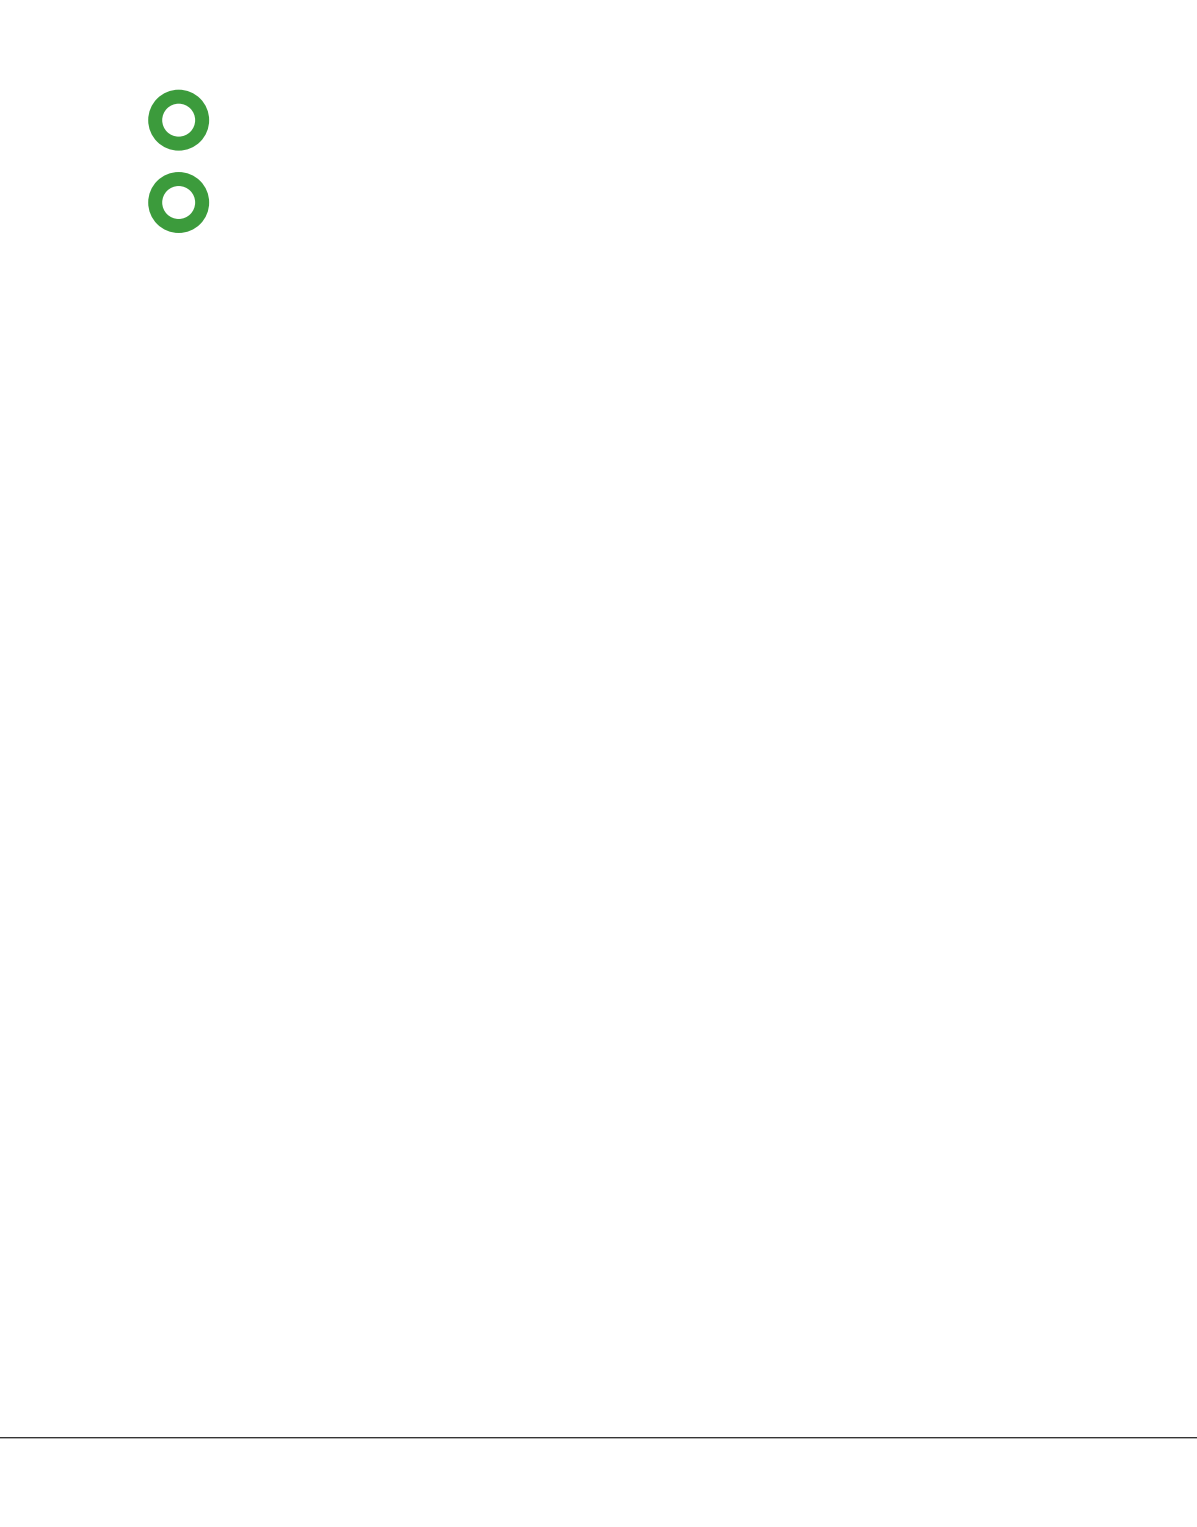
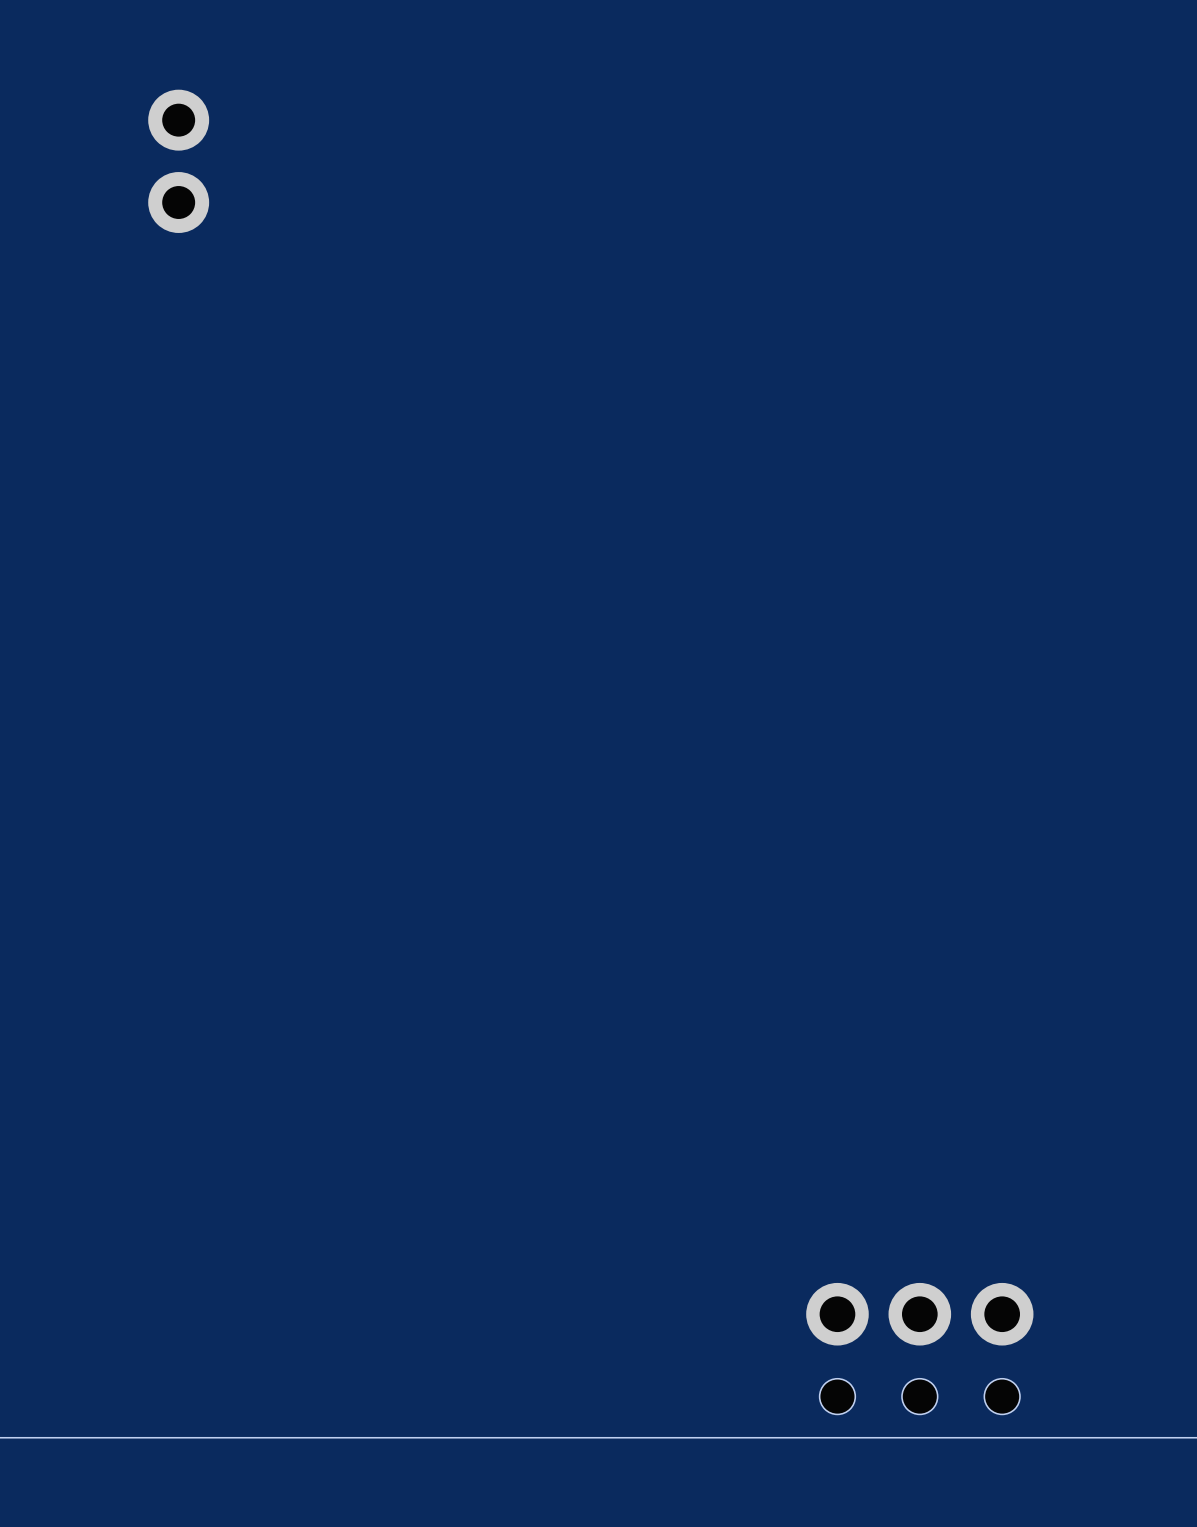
part: none -> (919, 1348)

